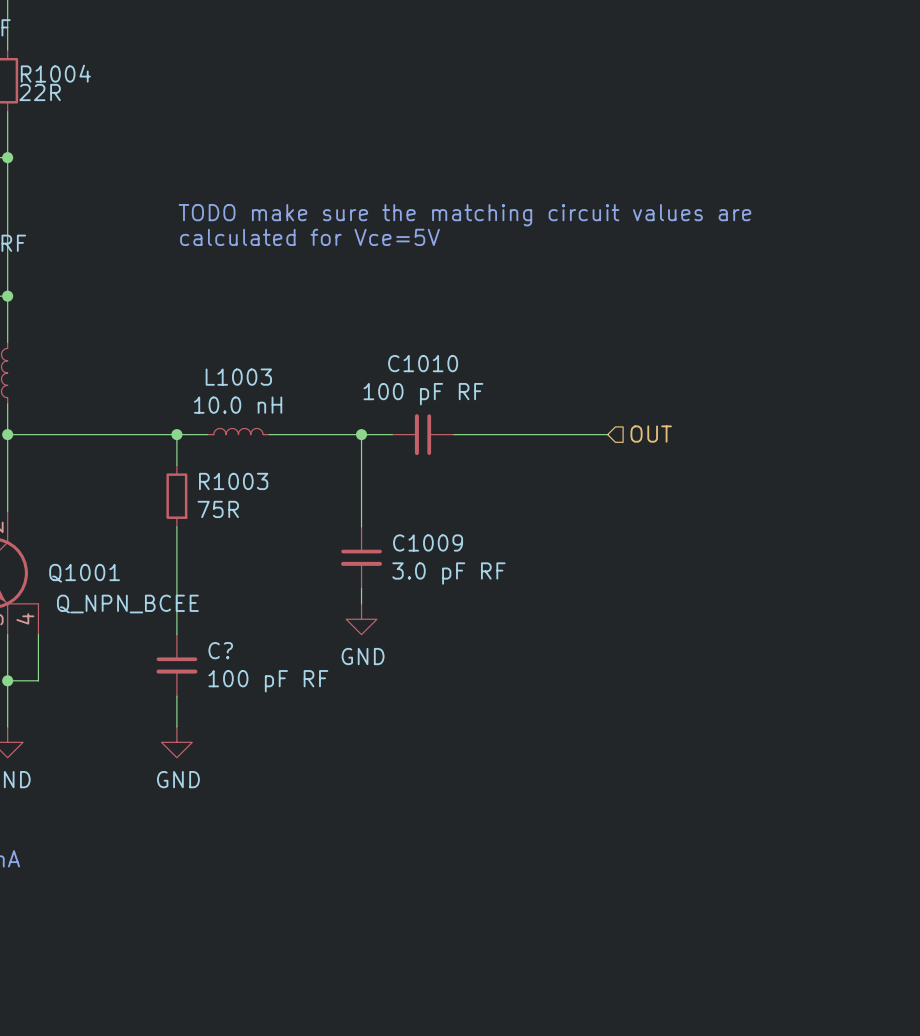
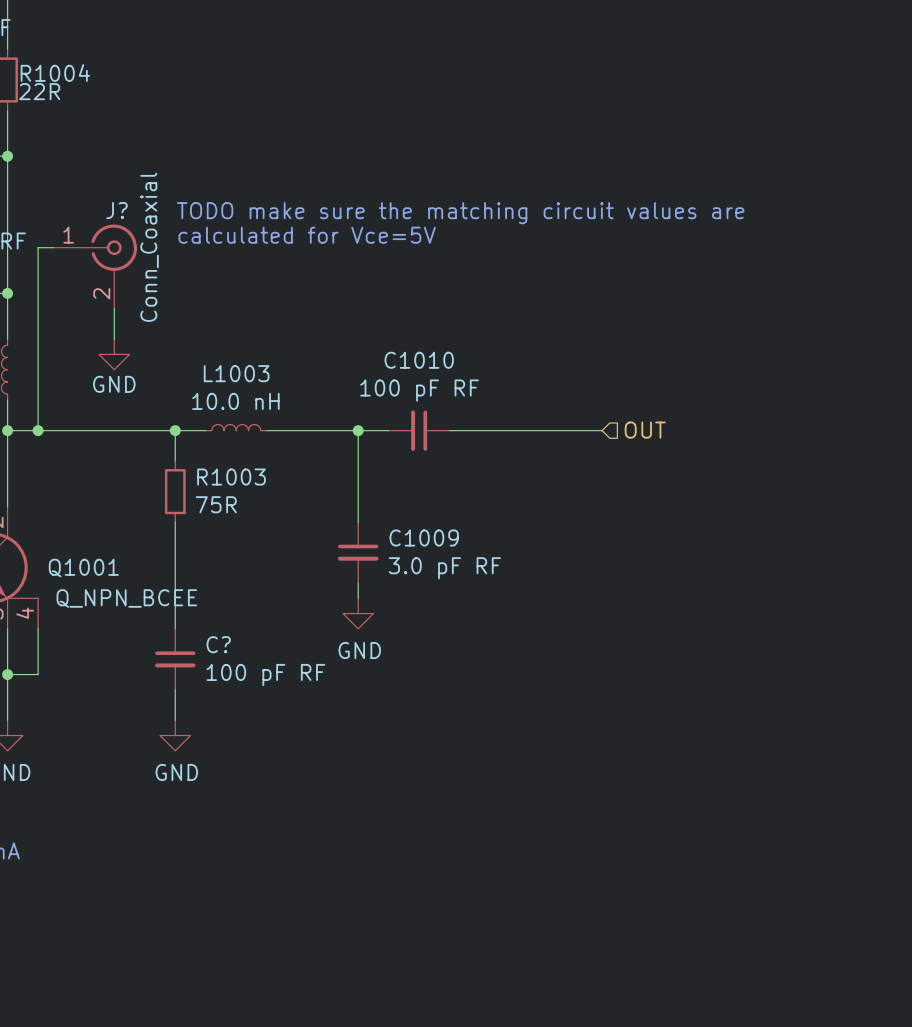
wire: none -> (53, 247) (38, 247) (38, 430)
J?: none -> Conn_Coaxial (95, 266)
wire: none -> (114, 308) (114, 339)
power symbol: none -> GND (114, 354)
junction: none -> (38, 430)

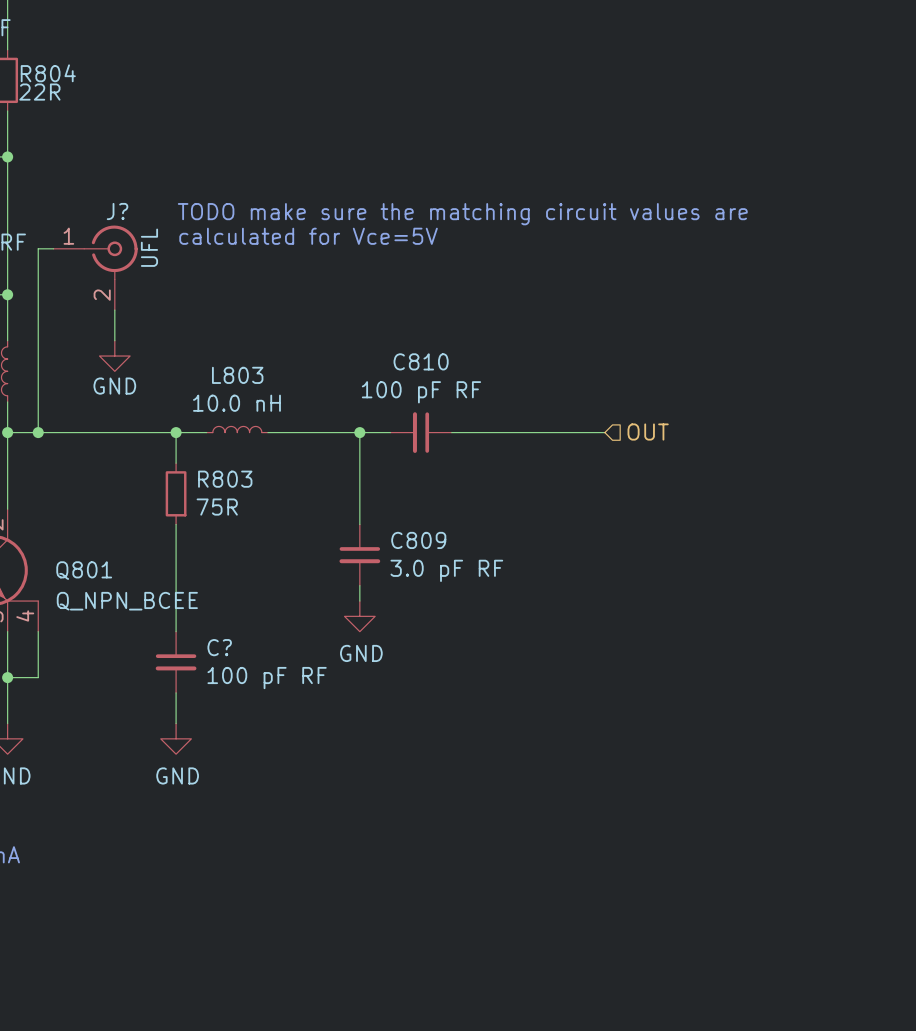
R1004 name: R1004 (55, 72) -> R804 (48, 73)
J? value: Conn_Coaxial (149, 247) -> UFL (149, 247)
C1010 name: C1010 (419, 360) -> C810 (421, 361)
L1003 name: L1003 (236, 373) -> L803 (237, 375)
R1003 name: R1003 (231, 477) -> R803 (225, 479)
C1009 name: C1009 (424, 538) -> C809 (418, 540)
Q1001 name: Q1001 (83, 568) -> Q801 (84, 570)

